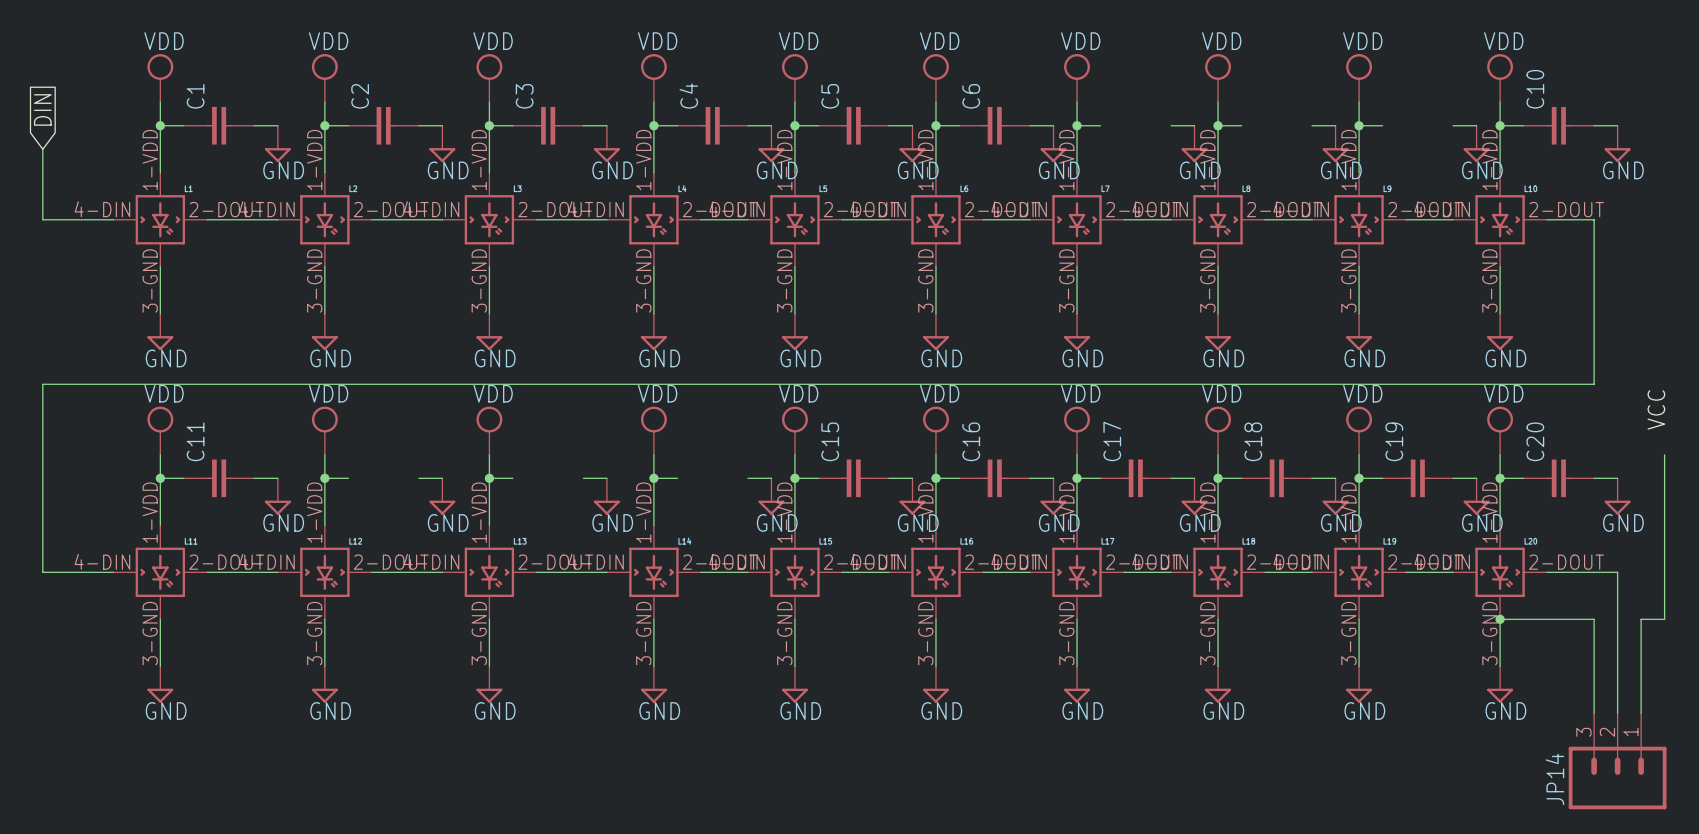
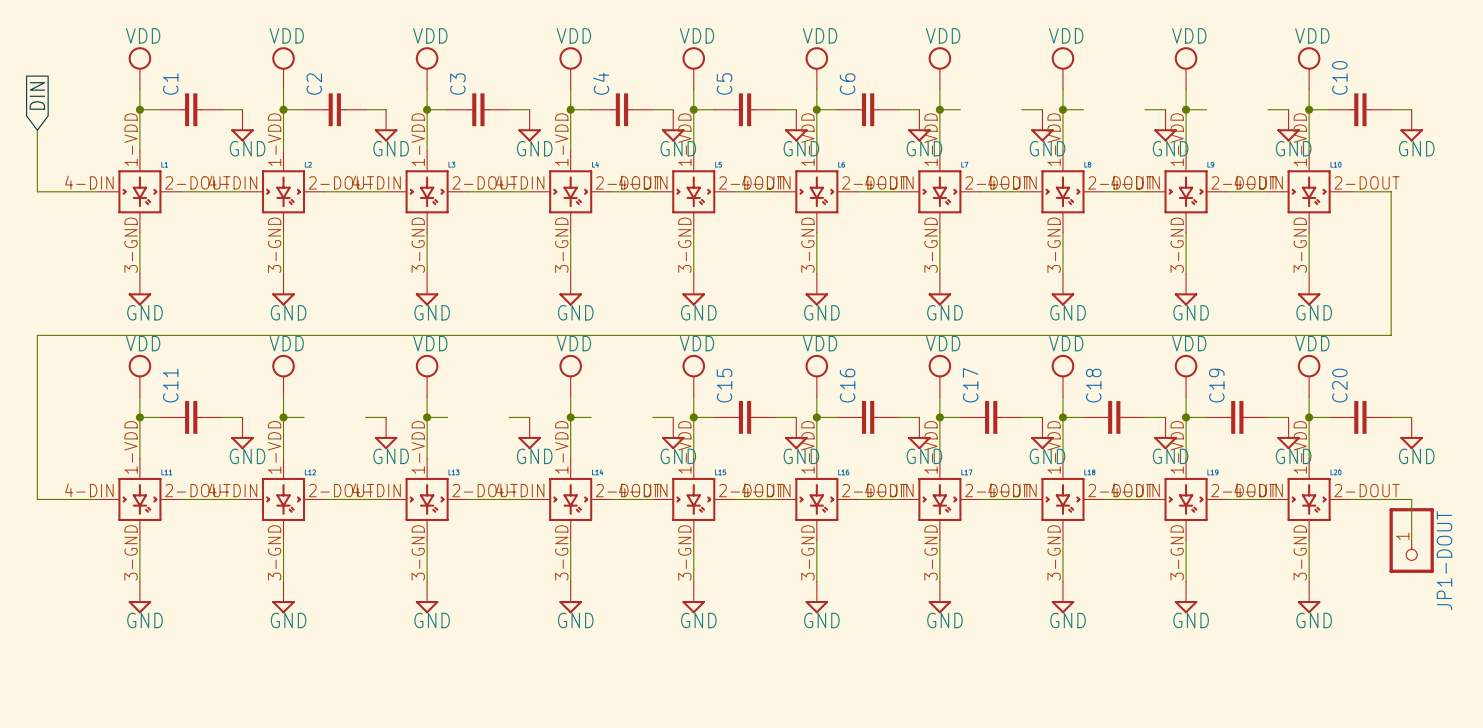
label: VCC (1656, 409) -> none
wire: (1664, 454) (1664, 619) (1641, 619) (1641, 713) -> none
wire: (1500, 619) (1594, 619) (1594, 713) -> none
junction: (1500, 619) -> none
wire: (1617, 619) (1617, 713) -> none
JP1-DOUT: none -> (1411, 540)
JP14: (1617, 761) -> none

